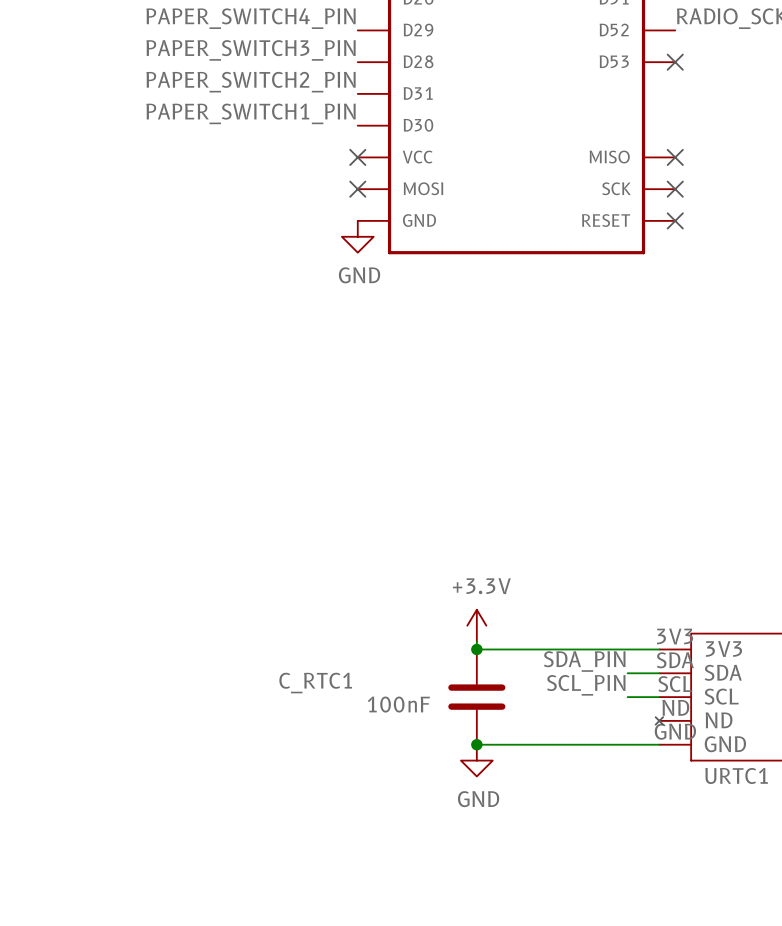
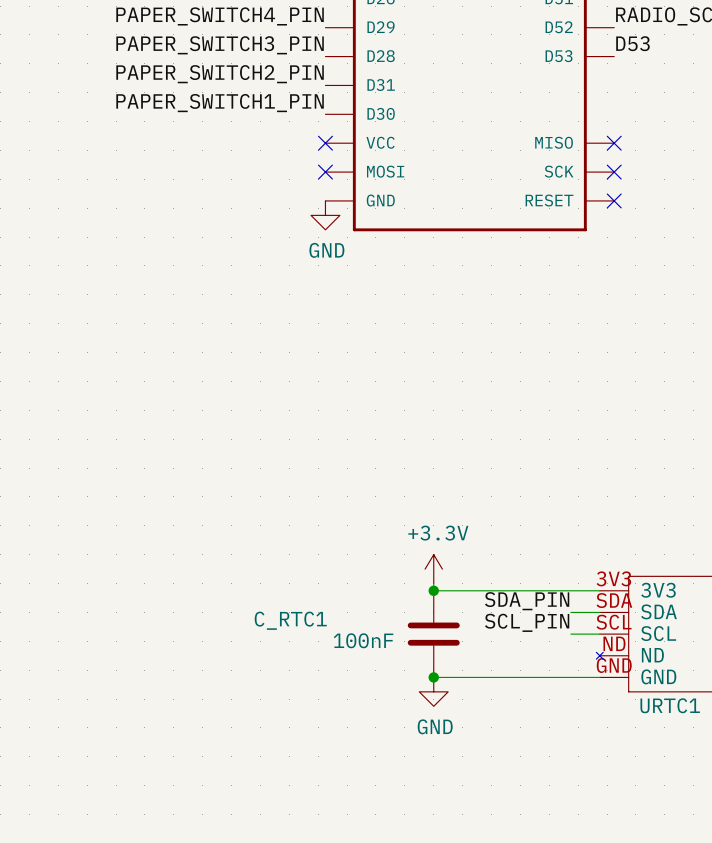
label: none -> D53 (632, 43)
no-connect mark: (675, 62) -> none

